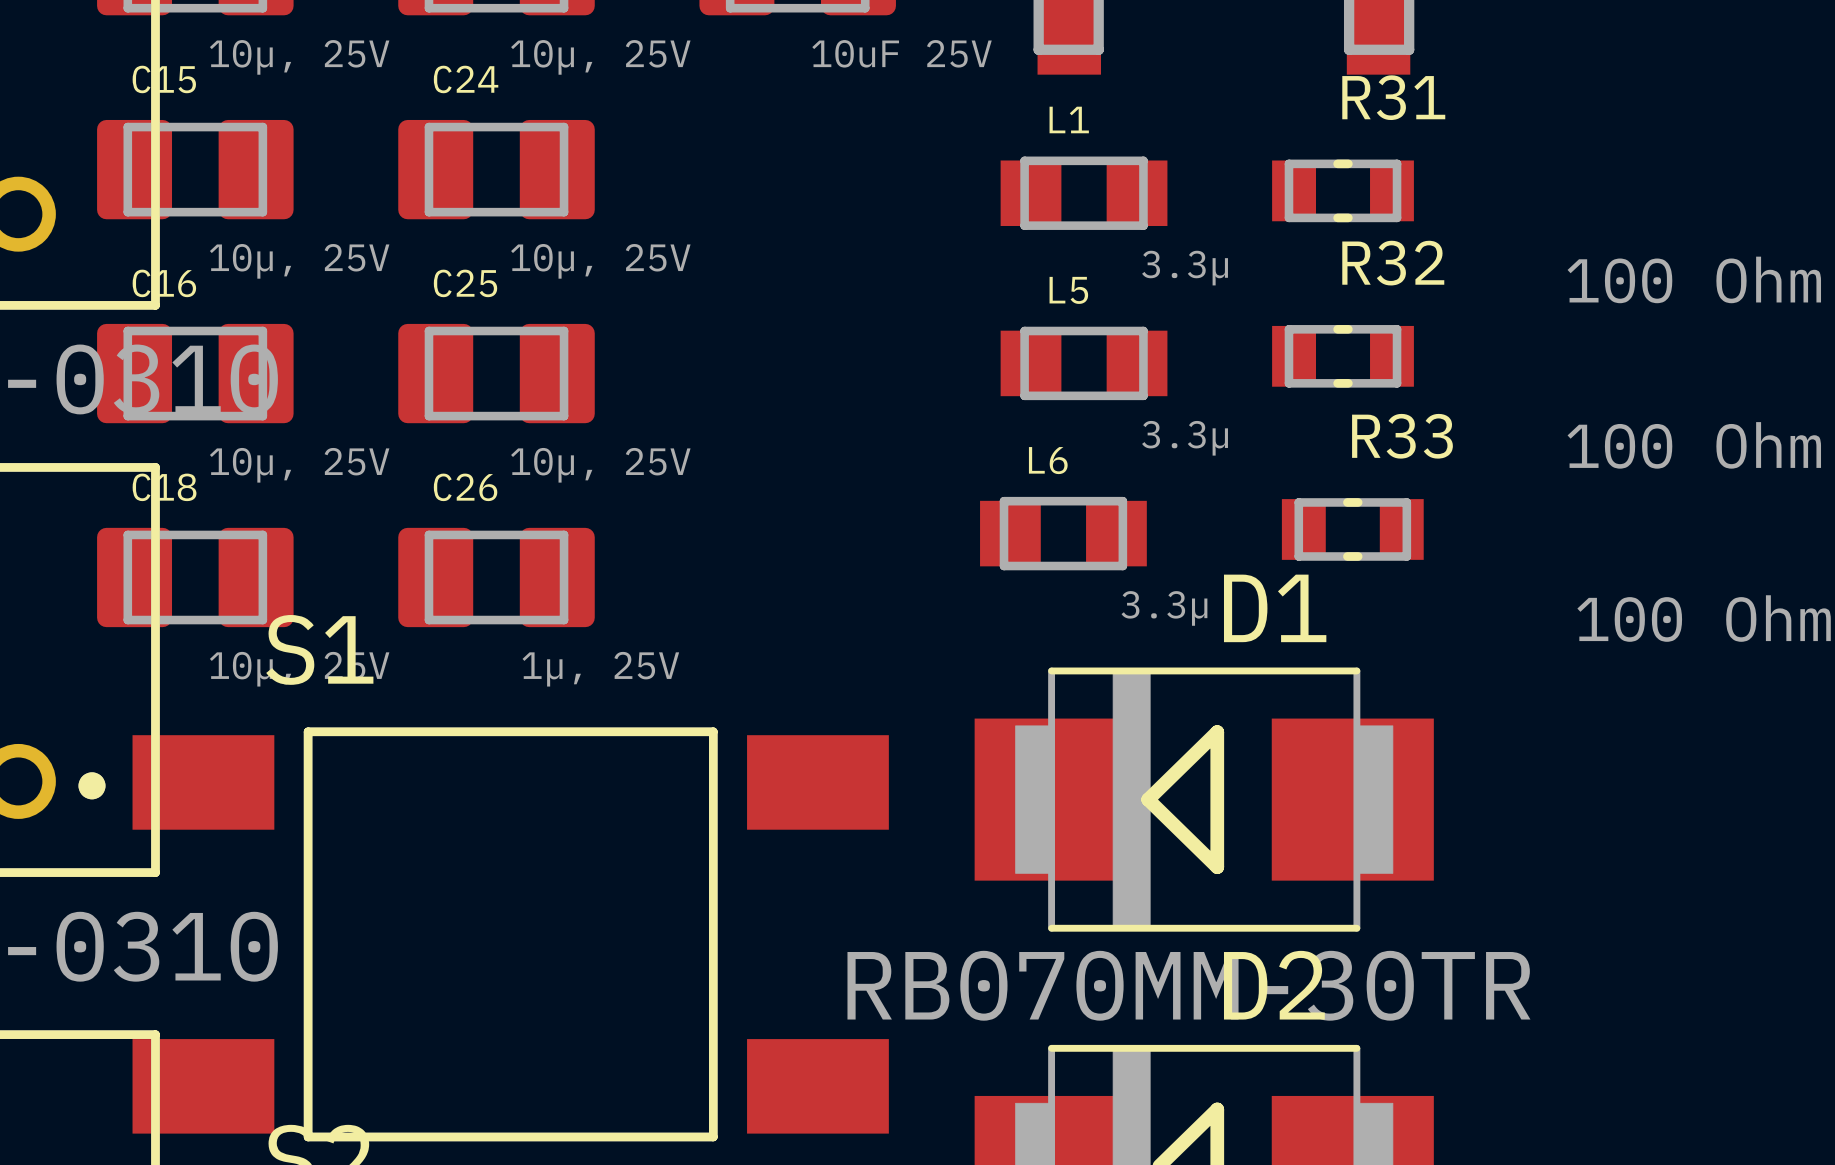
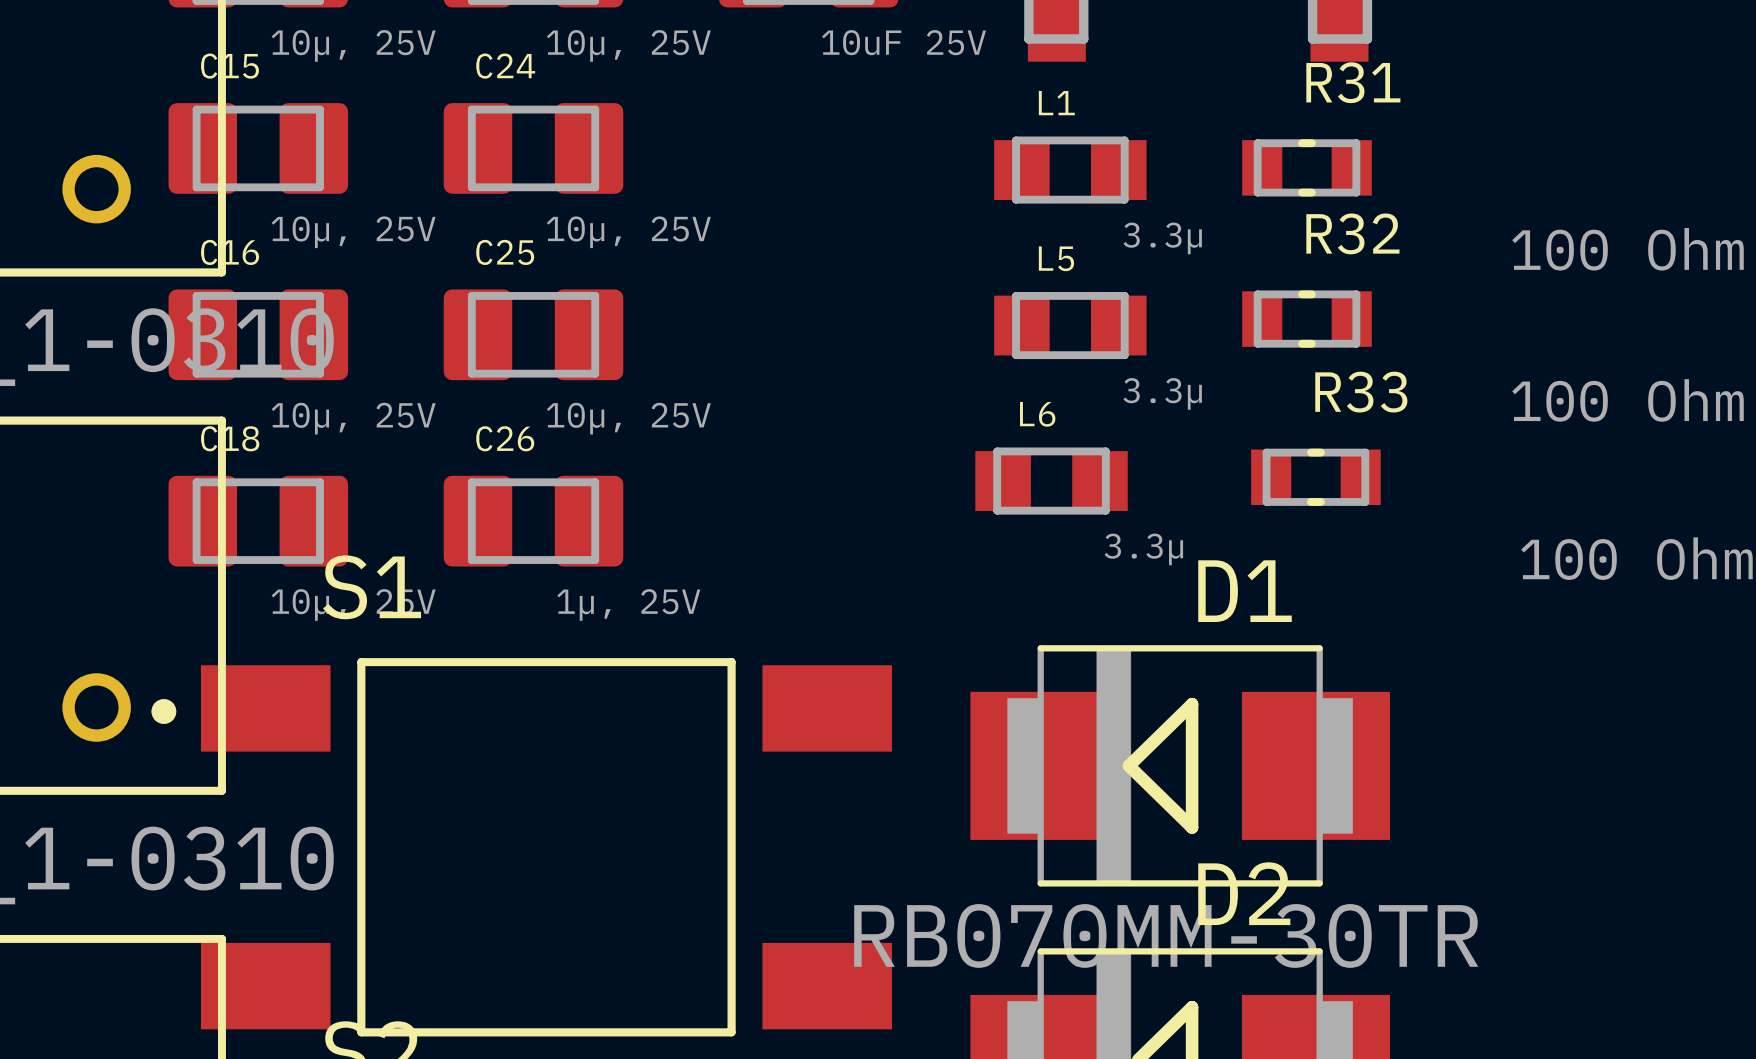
D1 position: (1204, 799) -> (1180, 765)

